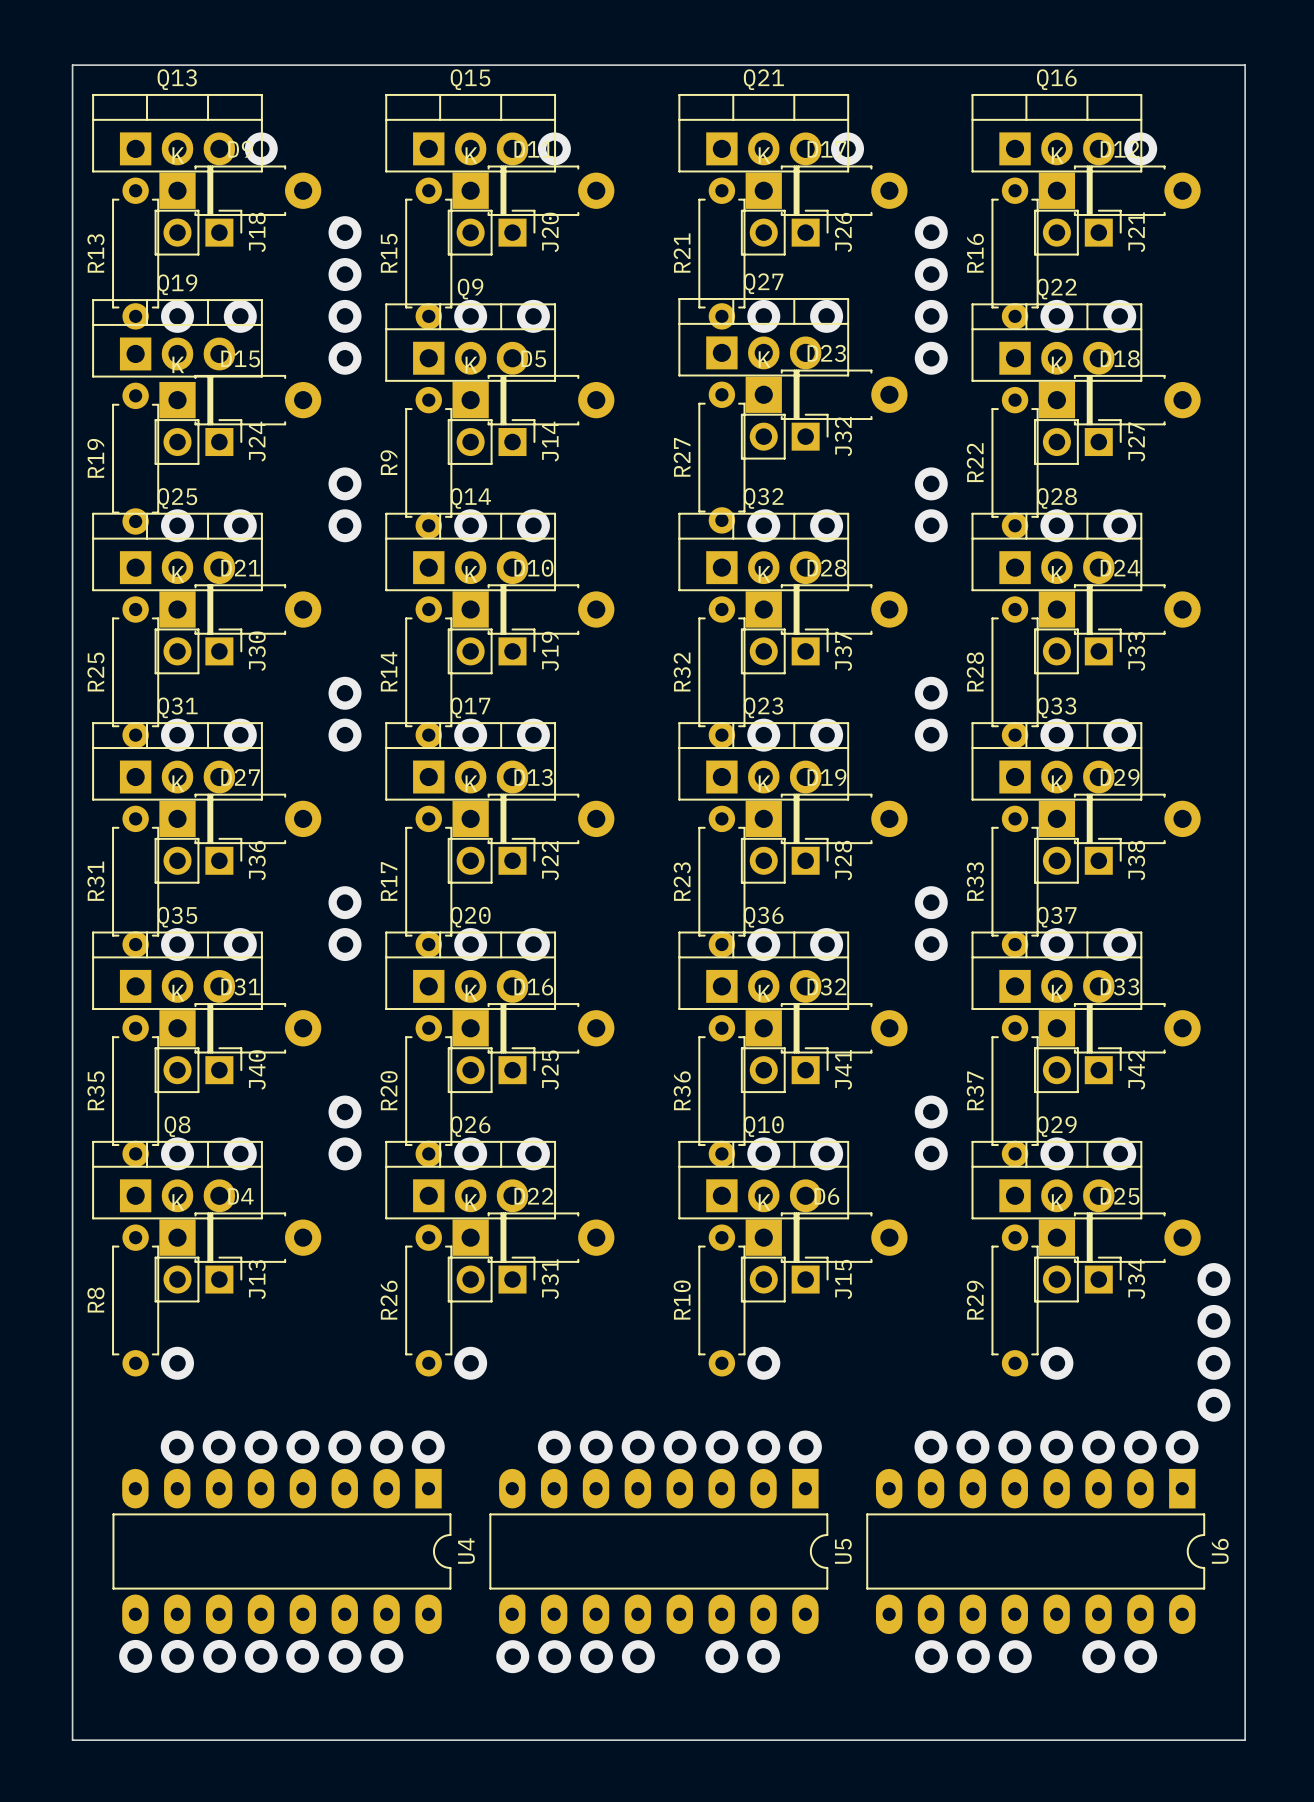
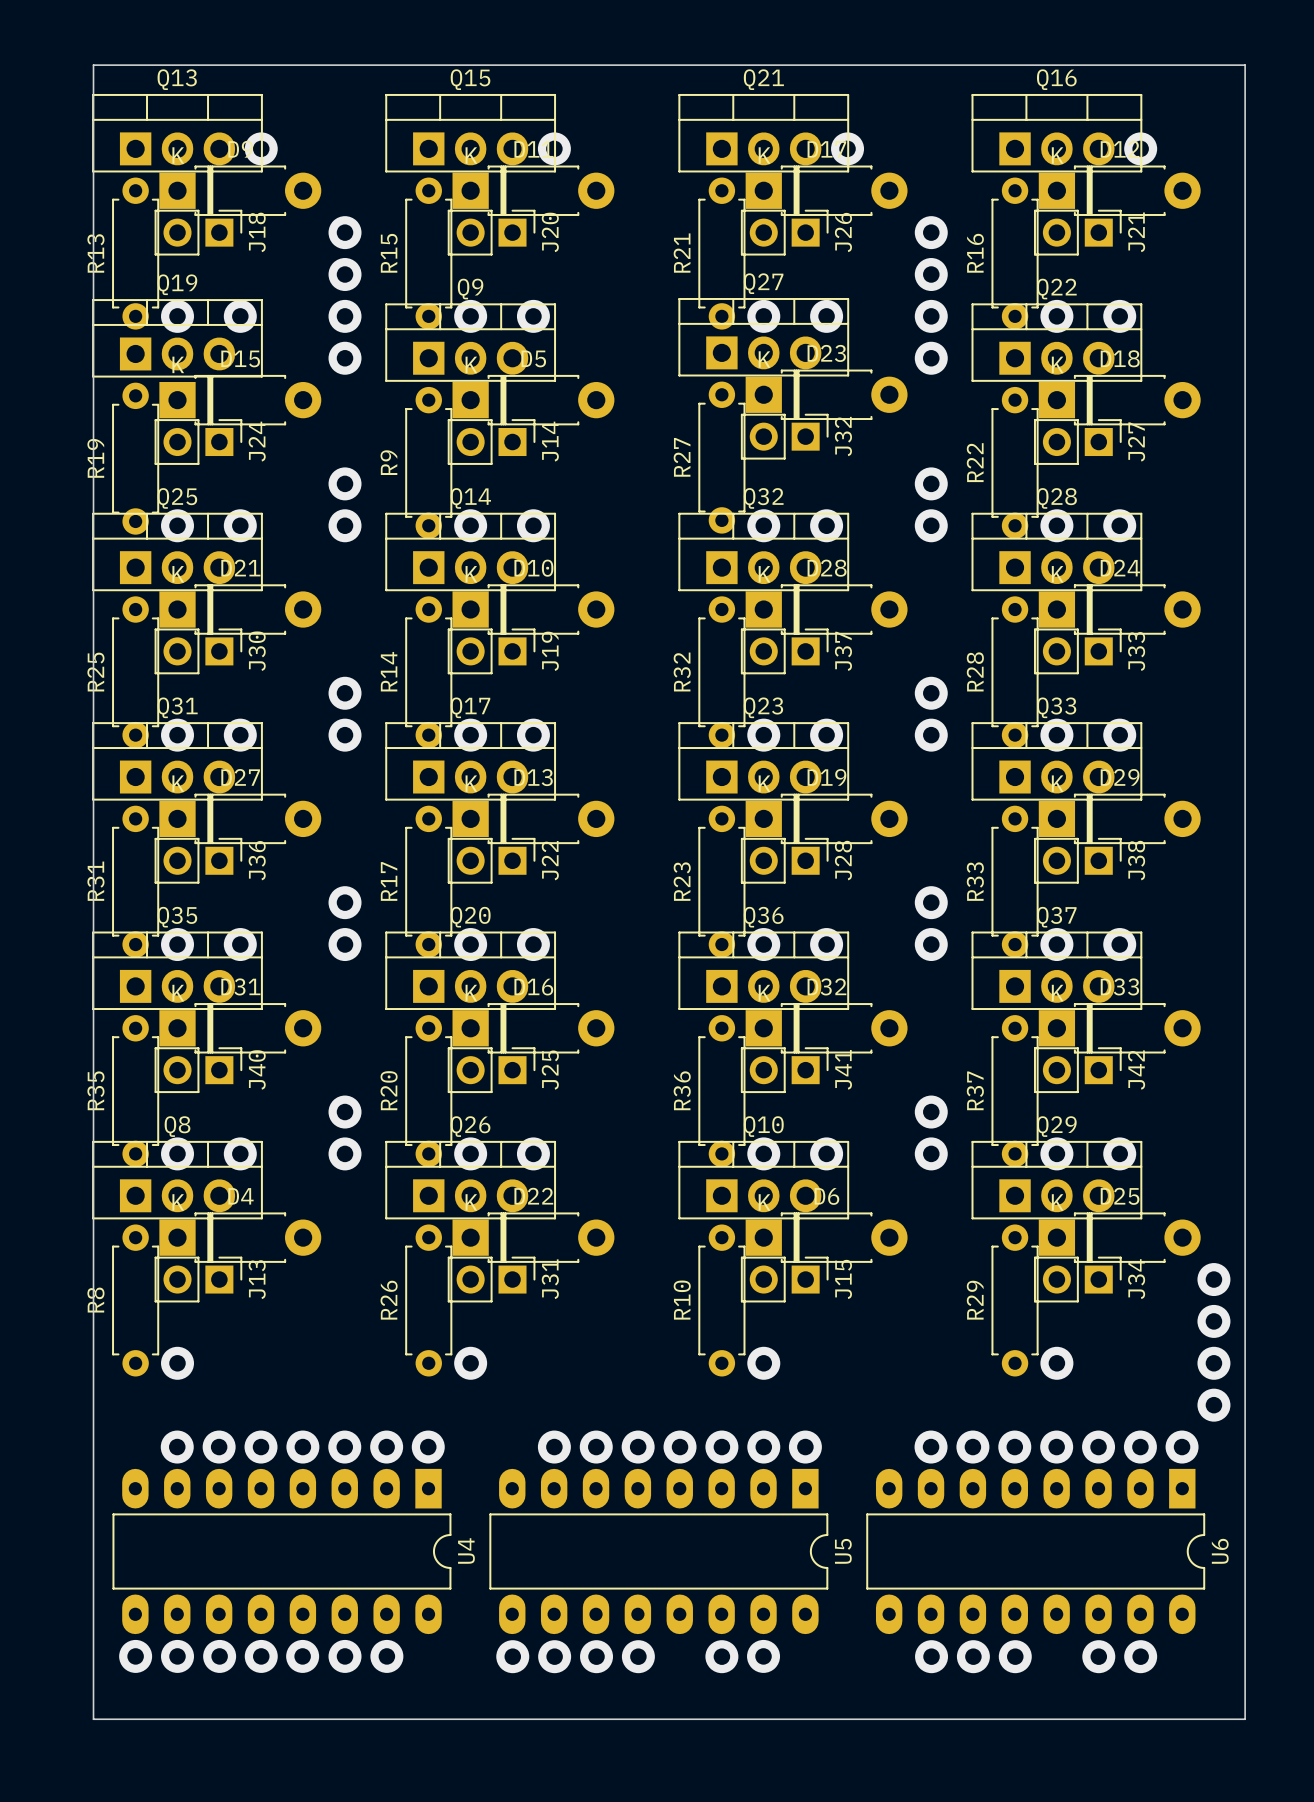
board edge: (93, 65) (72, 65) (72, 1740) (1245, 1740) (1245, 1719) -> (93, 65) (93, 1719) (1245, 1719)

